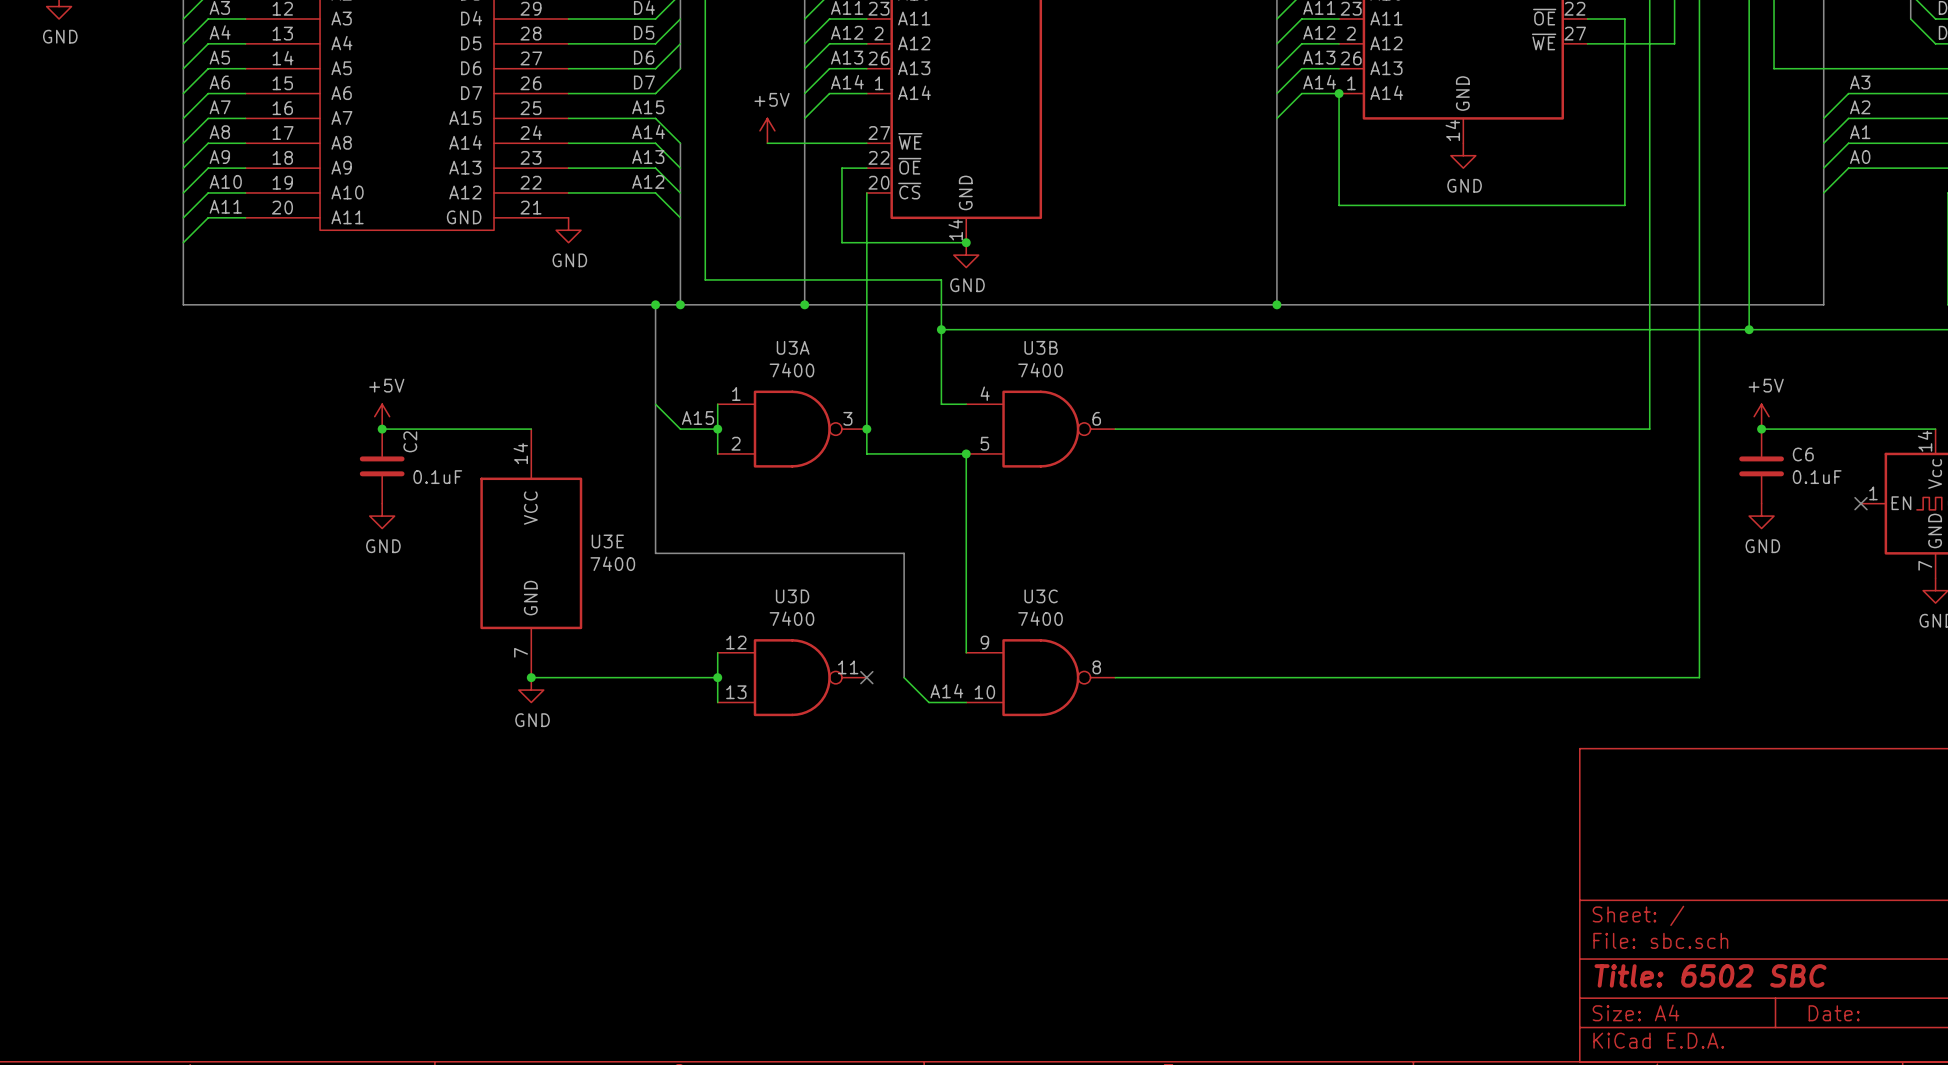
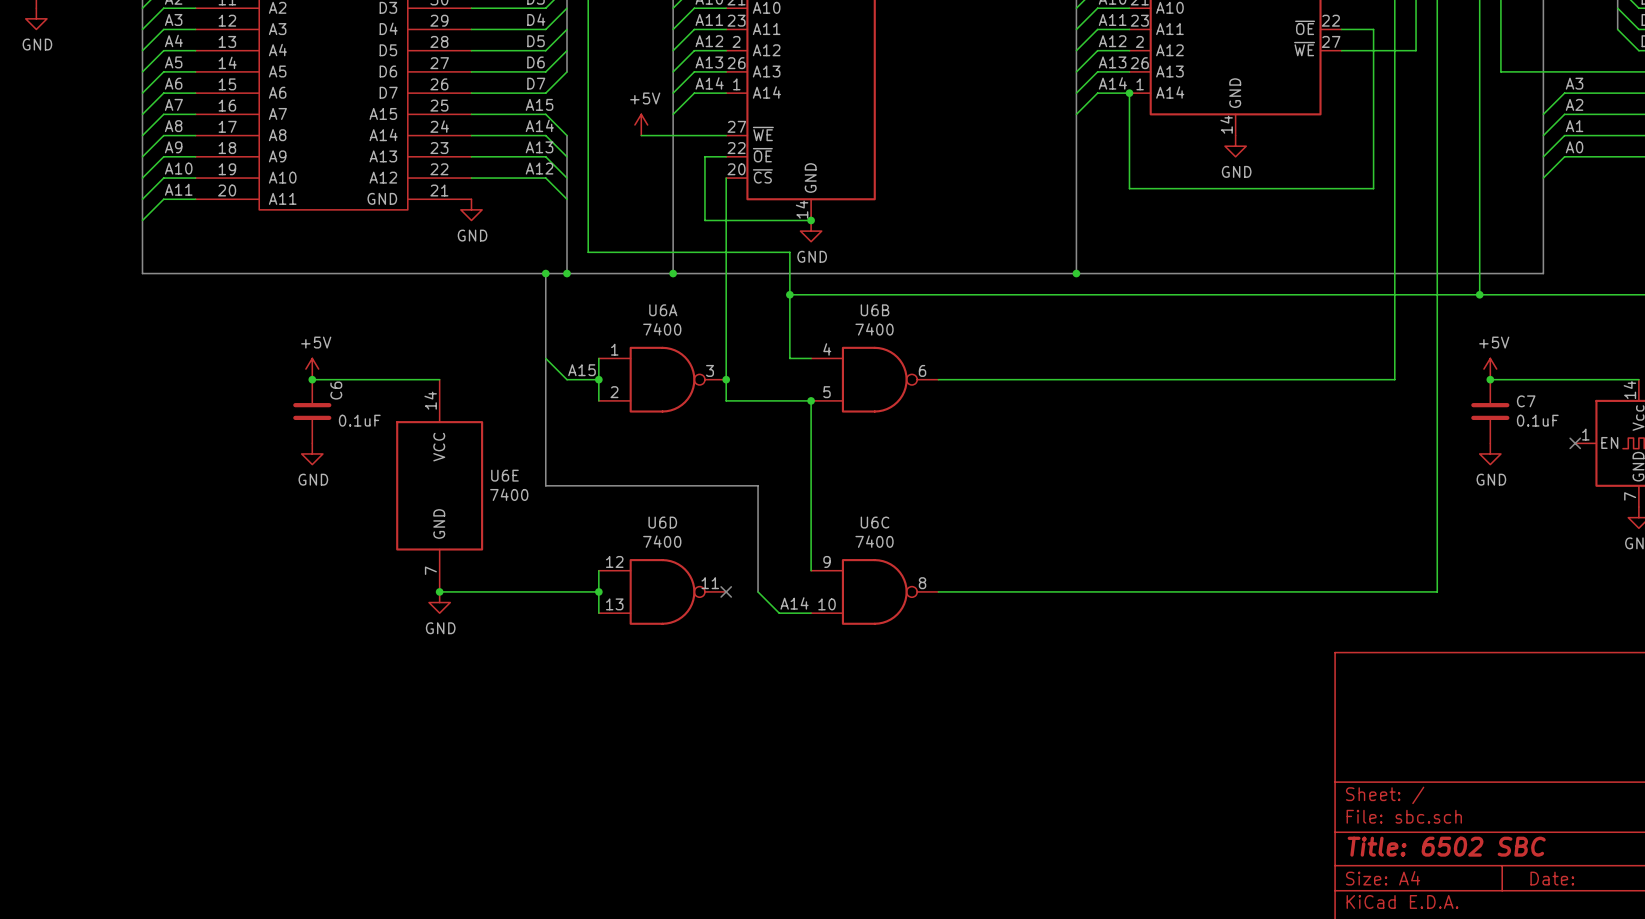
U3A name: U3A (793, 347) -> U6A (663, 310)
U3B name: U3B (1041, 347) -> U6B (875, 310)
C2 name: C2 (410, 441) -> C6 (336, 390)
C6 name: C6 (1803, 454) -> C7 (1526, 401)
U3E name: U3E (607, 541) -> U6E (504, 475)
U3D name: U3D (792, 596) -> U6D (662, 522)
U3C name: U3C (1041, 596) -> U6C (875, 522)

